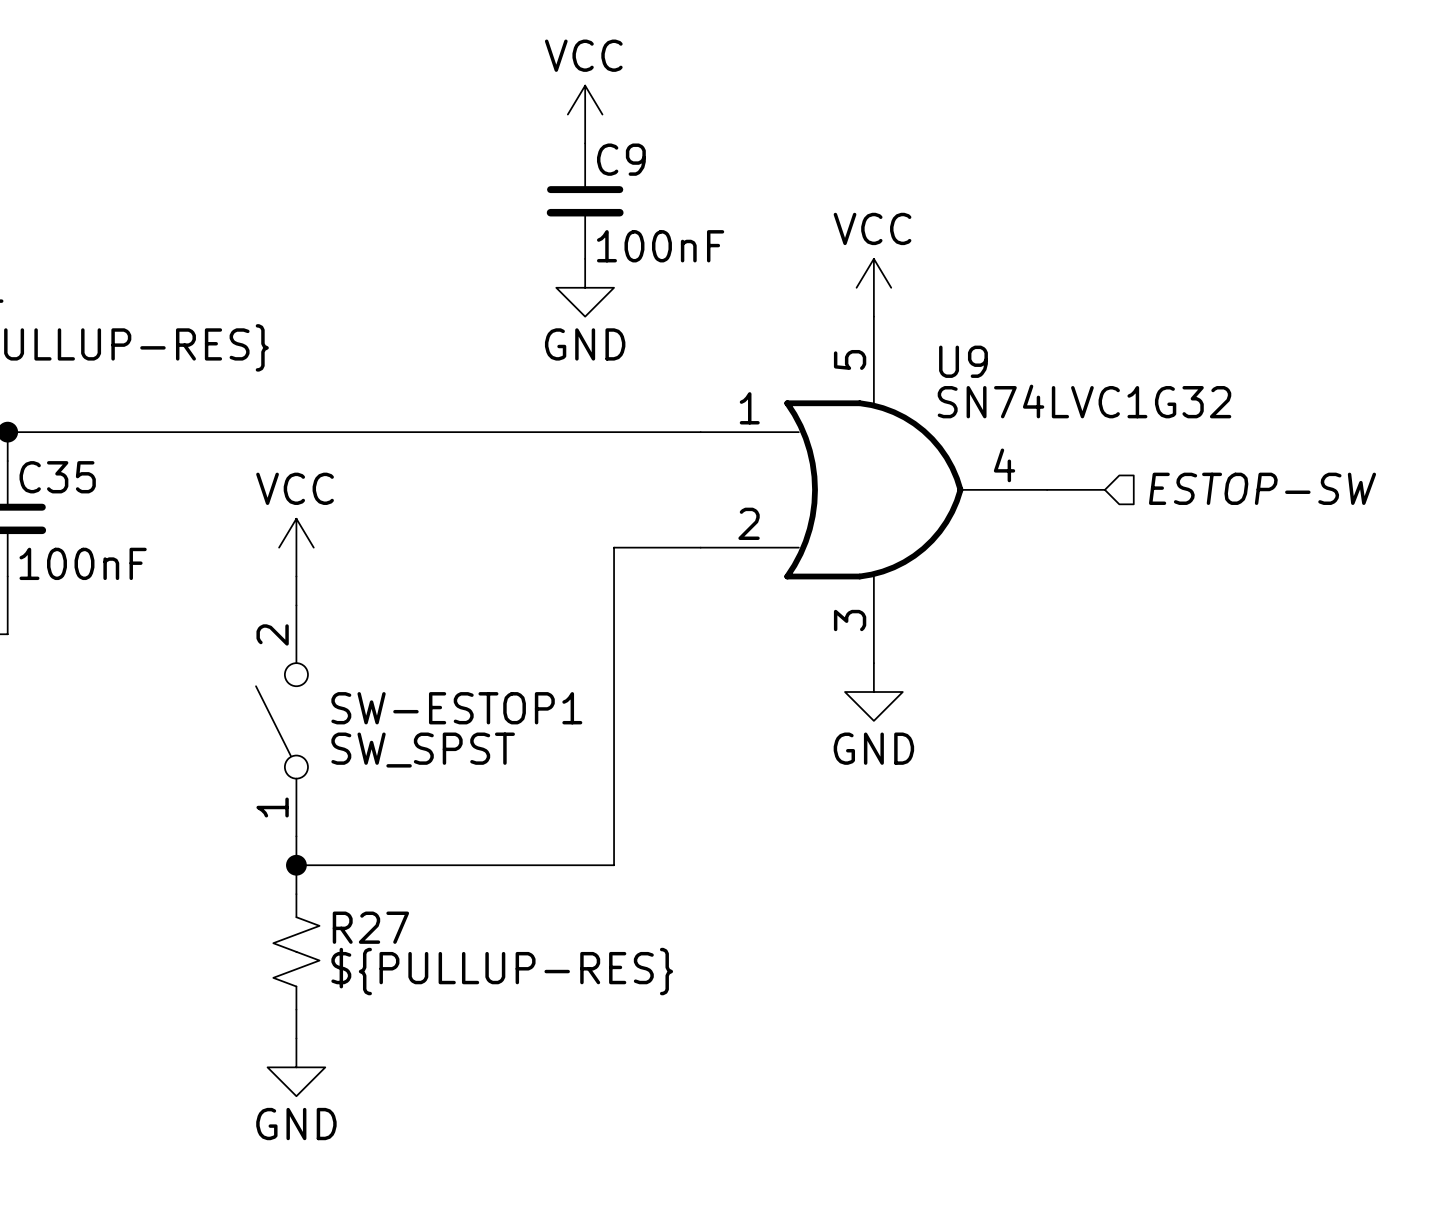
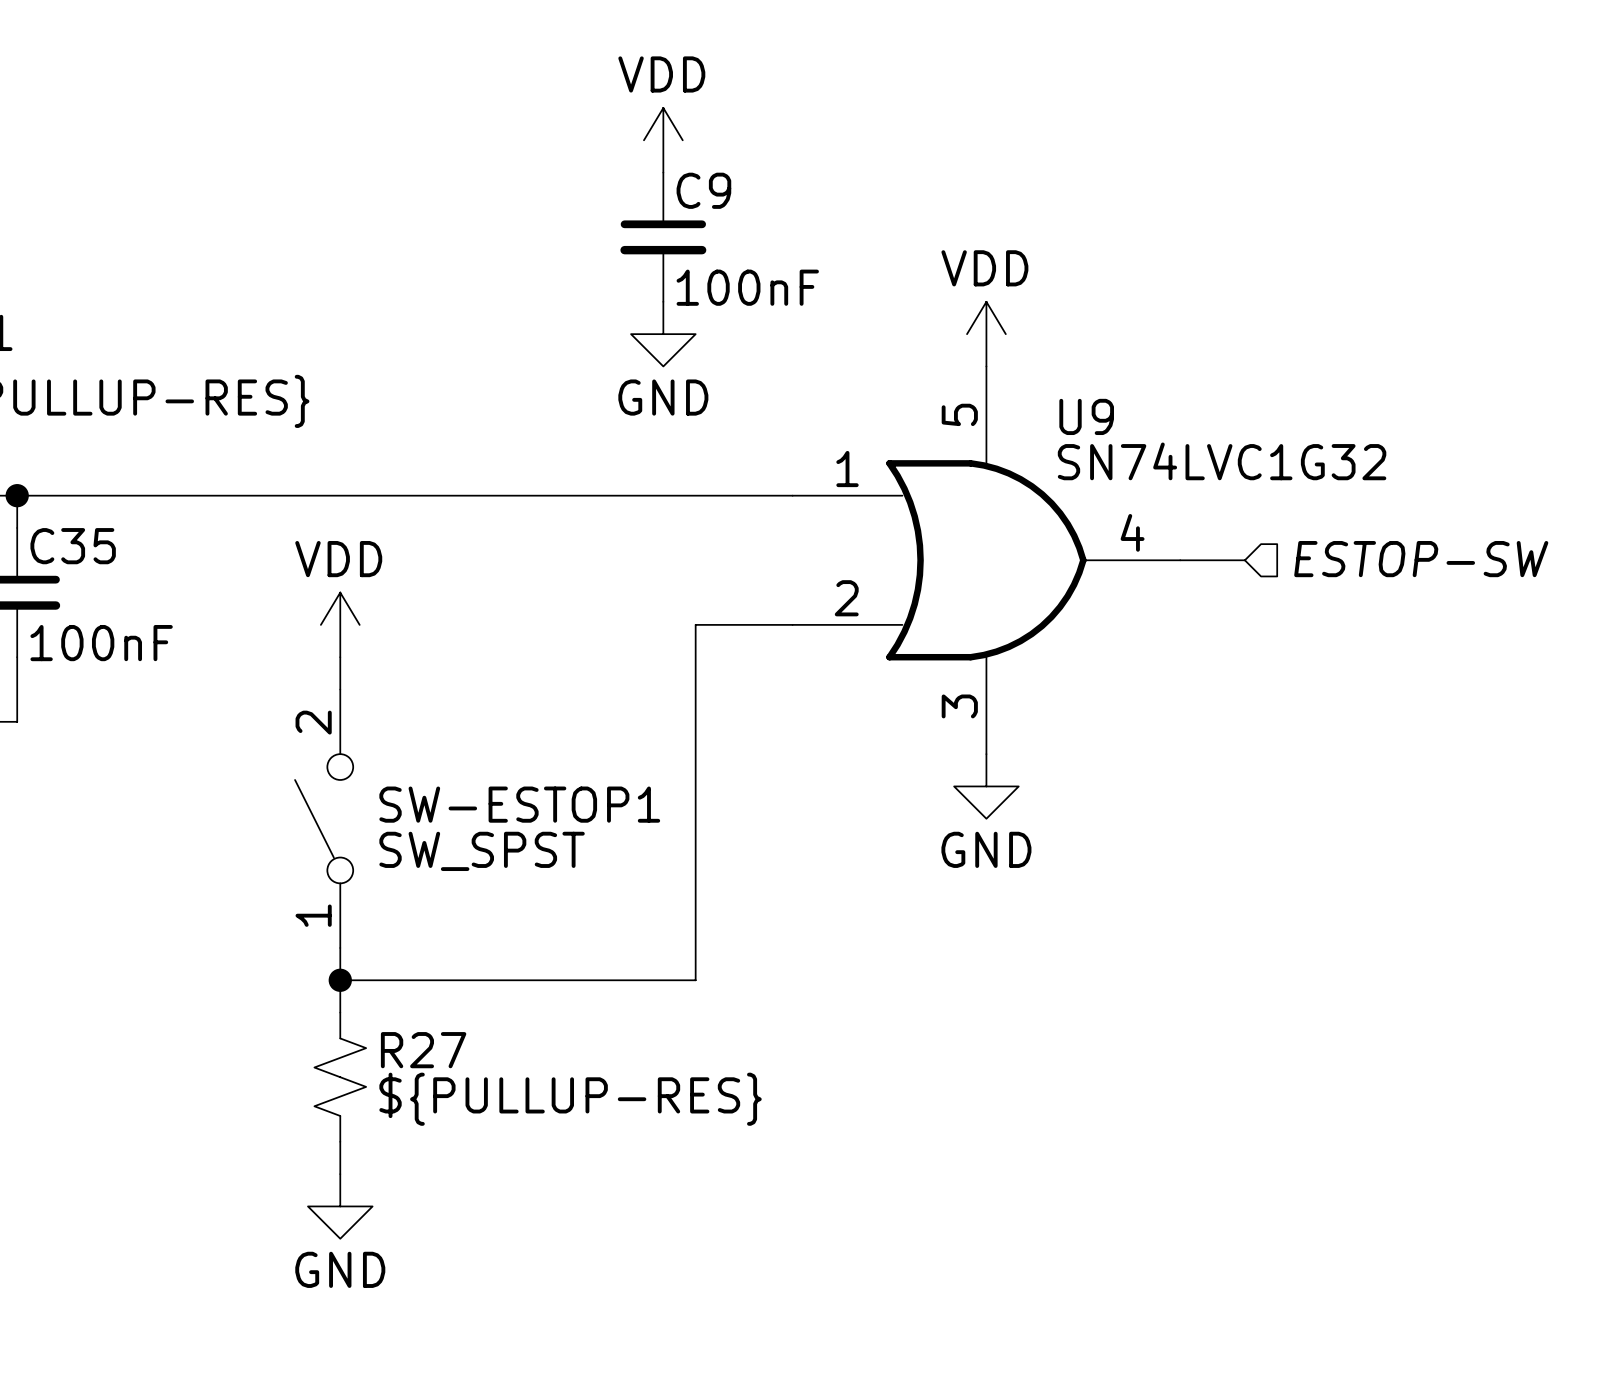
power symbol: VCC (585, 114) -> VDD (663, 140)
power symbol: VCC (873, 287) -> VDD (986, 334)
power symbol: VCC (296, 547) -> VDD (340, 624)

